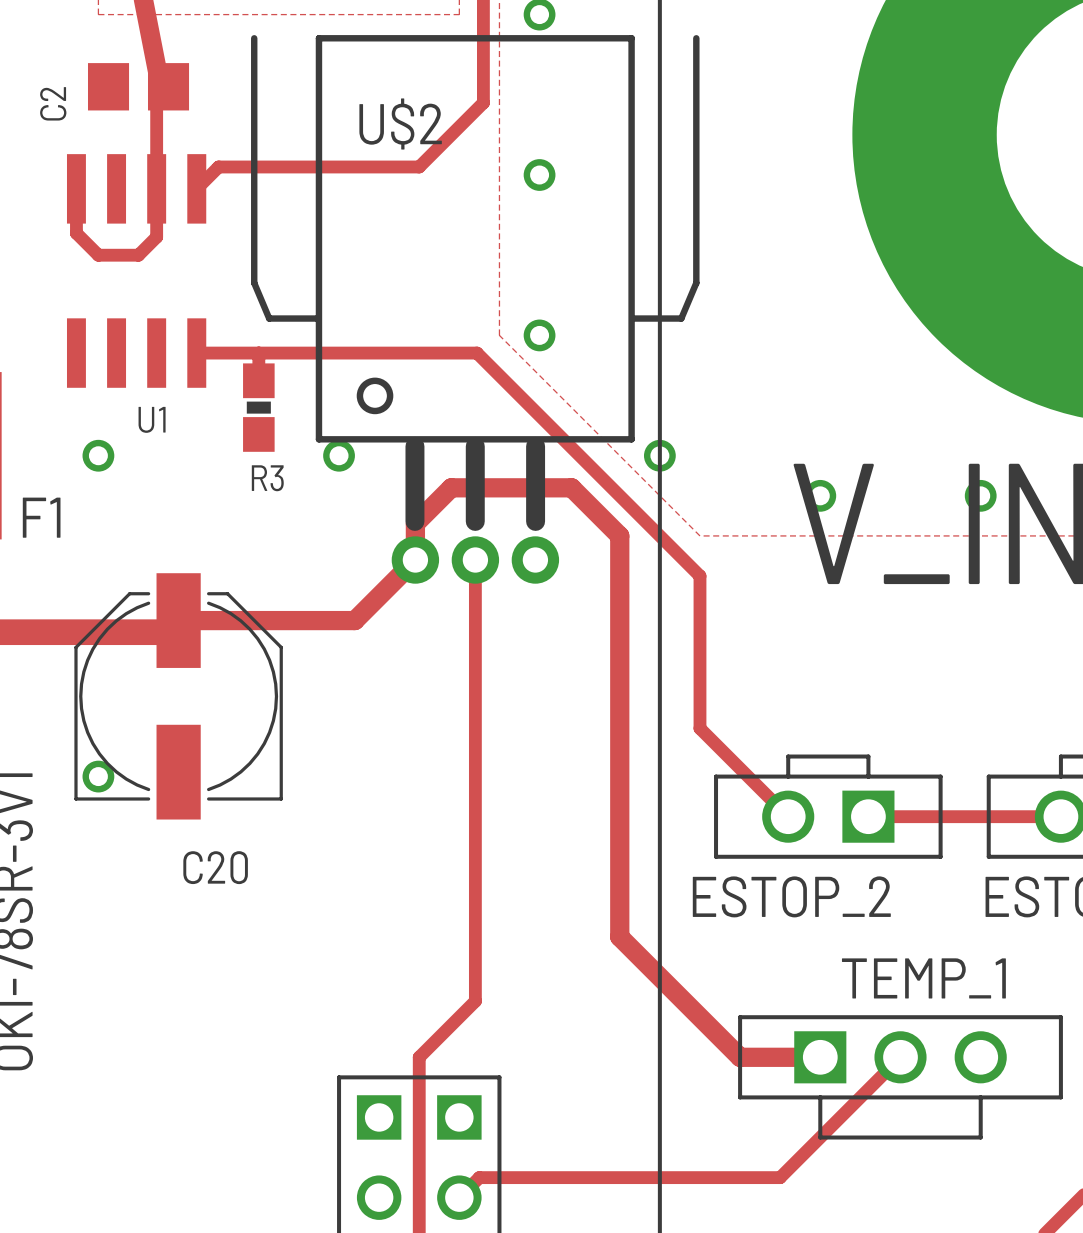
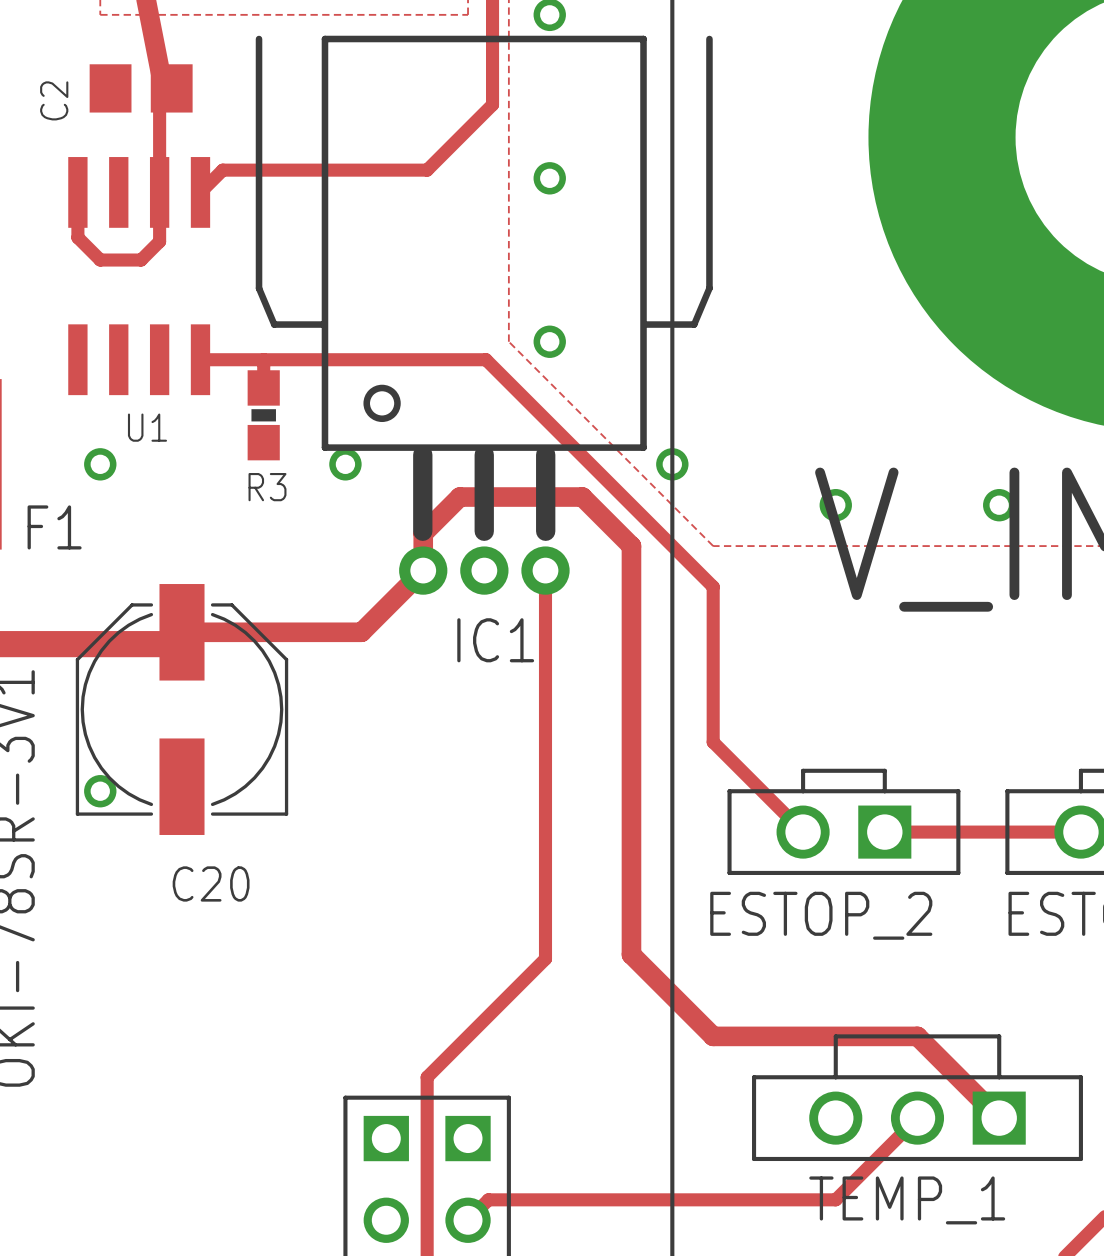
U$2 name: U$2 (400, 123) -> IC1 (495, 640)
track: (475, 560) (475, 1001) -> (545, 570) (545, 958) (484, 1020)
track: (699, 1017) (740, 1057) (820, 1057) -> (713, 1036) (917, 1036) (999, 1118)
track: (900, 1057) (780, 1177) -> (917, 1118) (835, 1199) (794, 1199)
TEMP_1 rotation: 0° (900, 1077) -> 180° (917, 1097)

